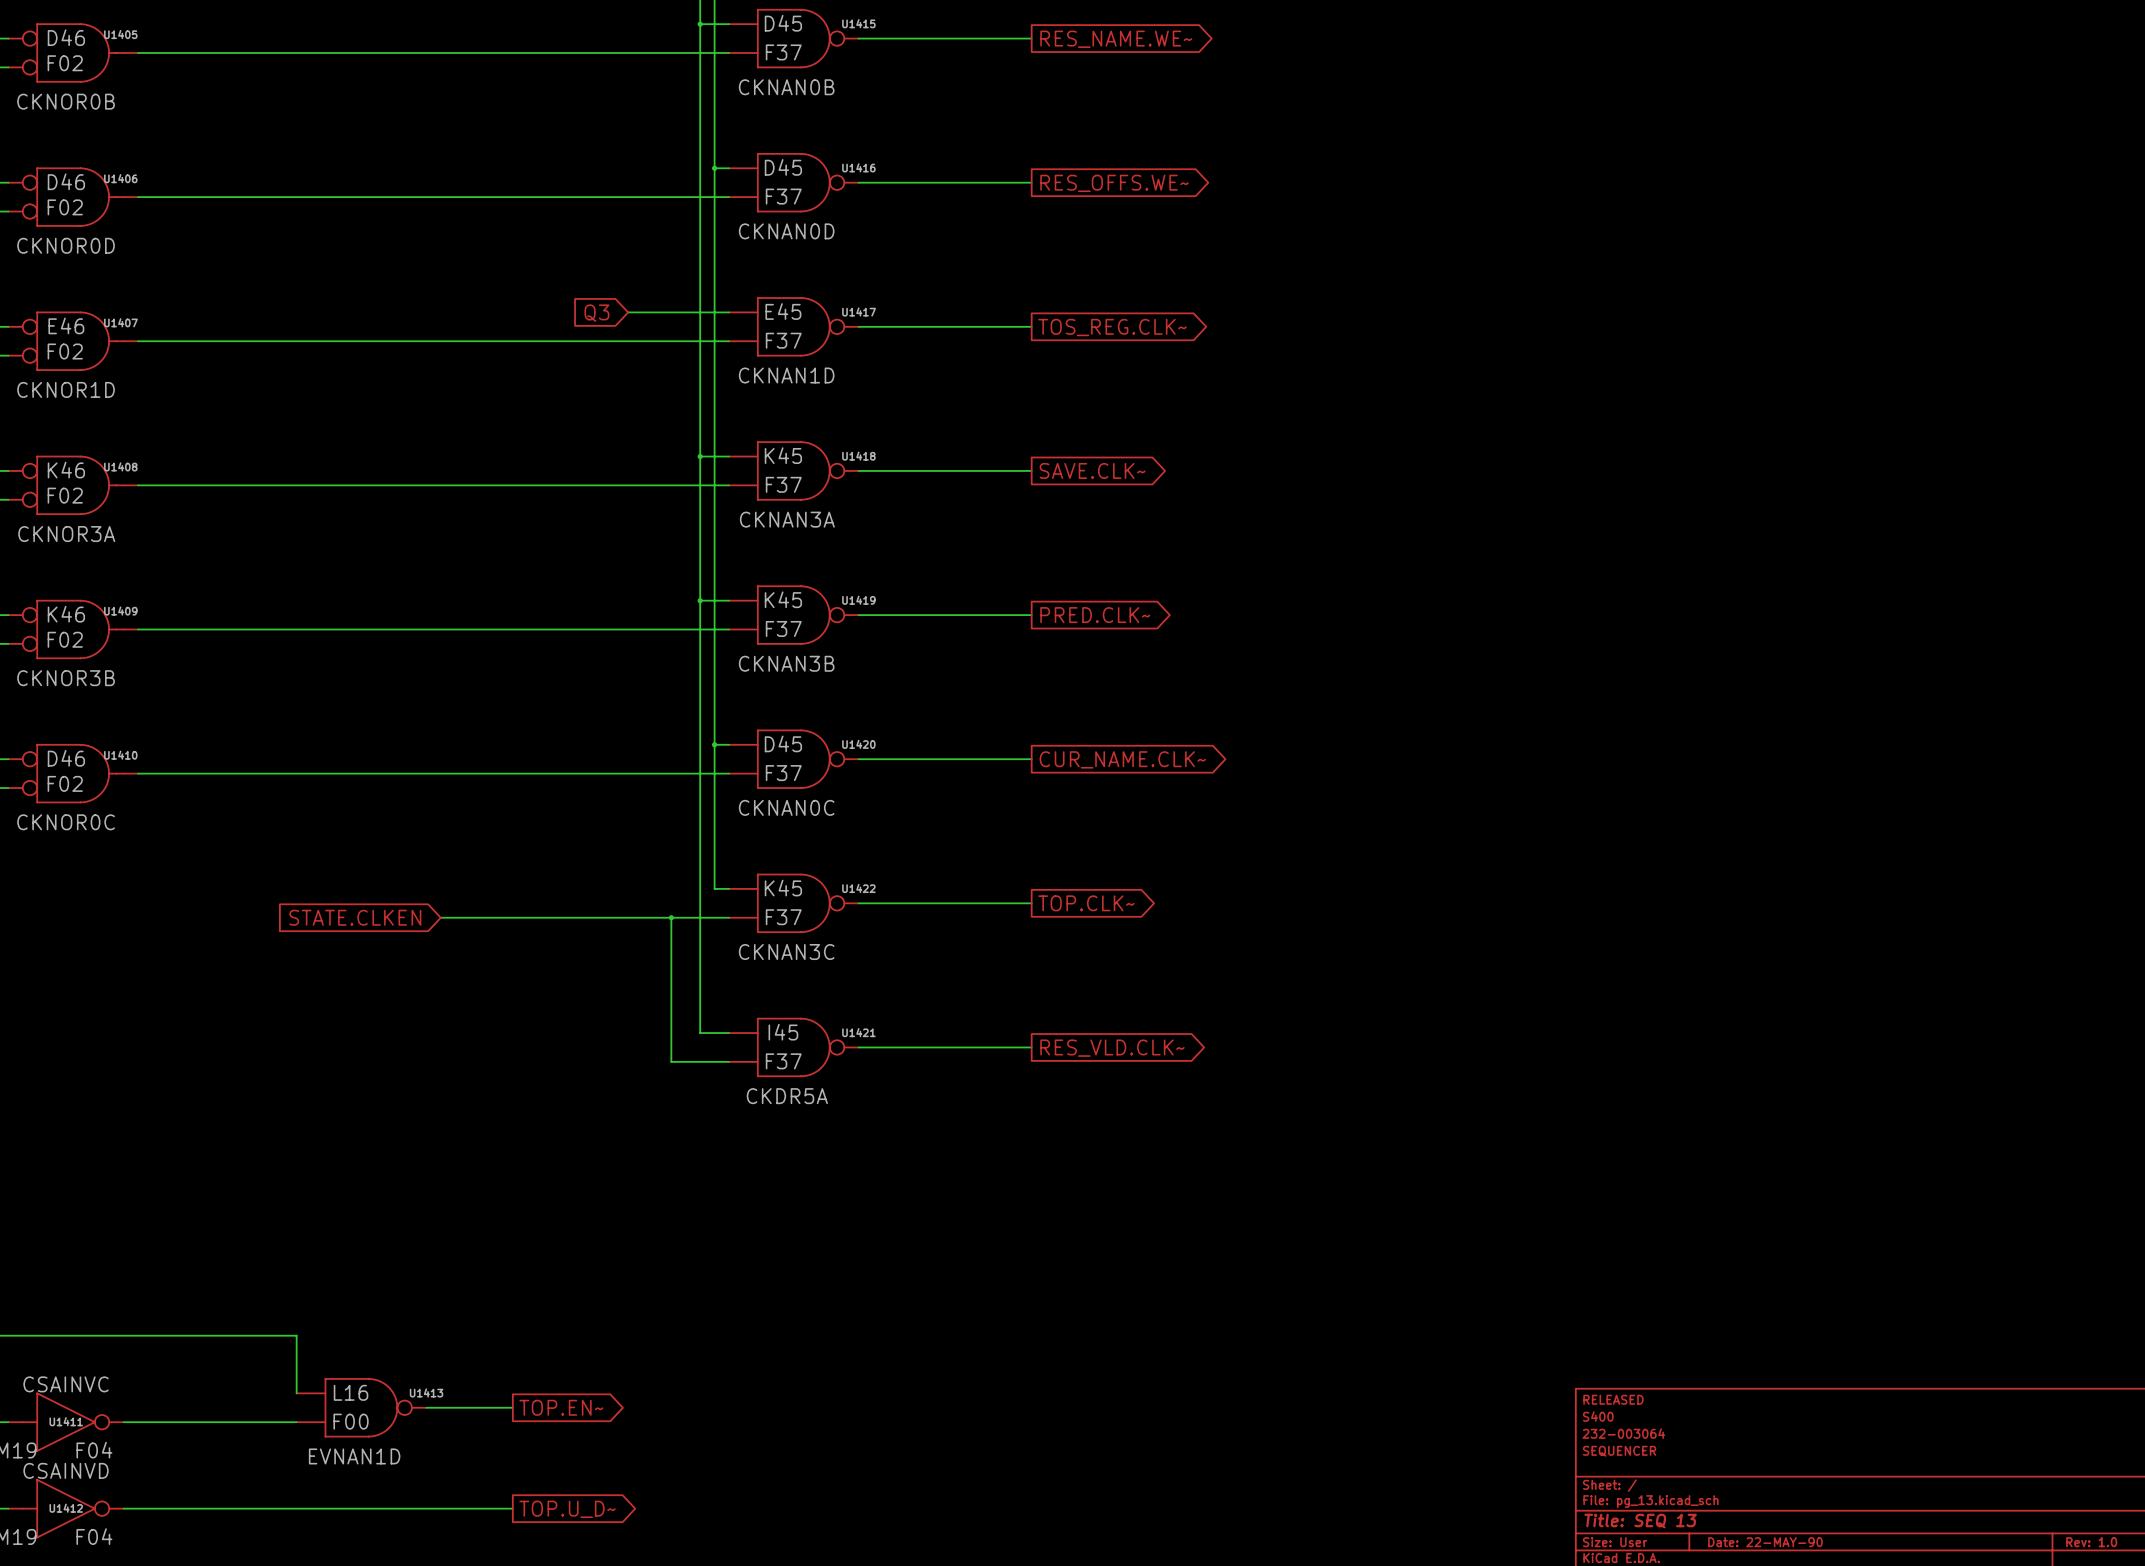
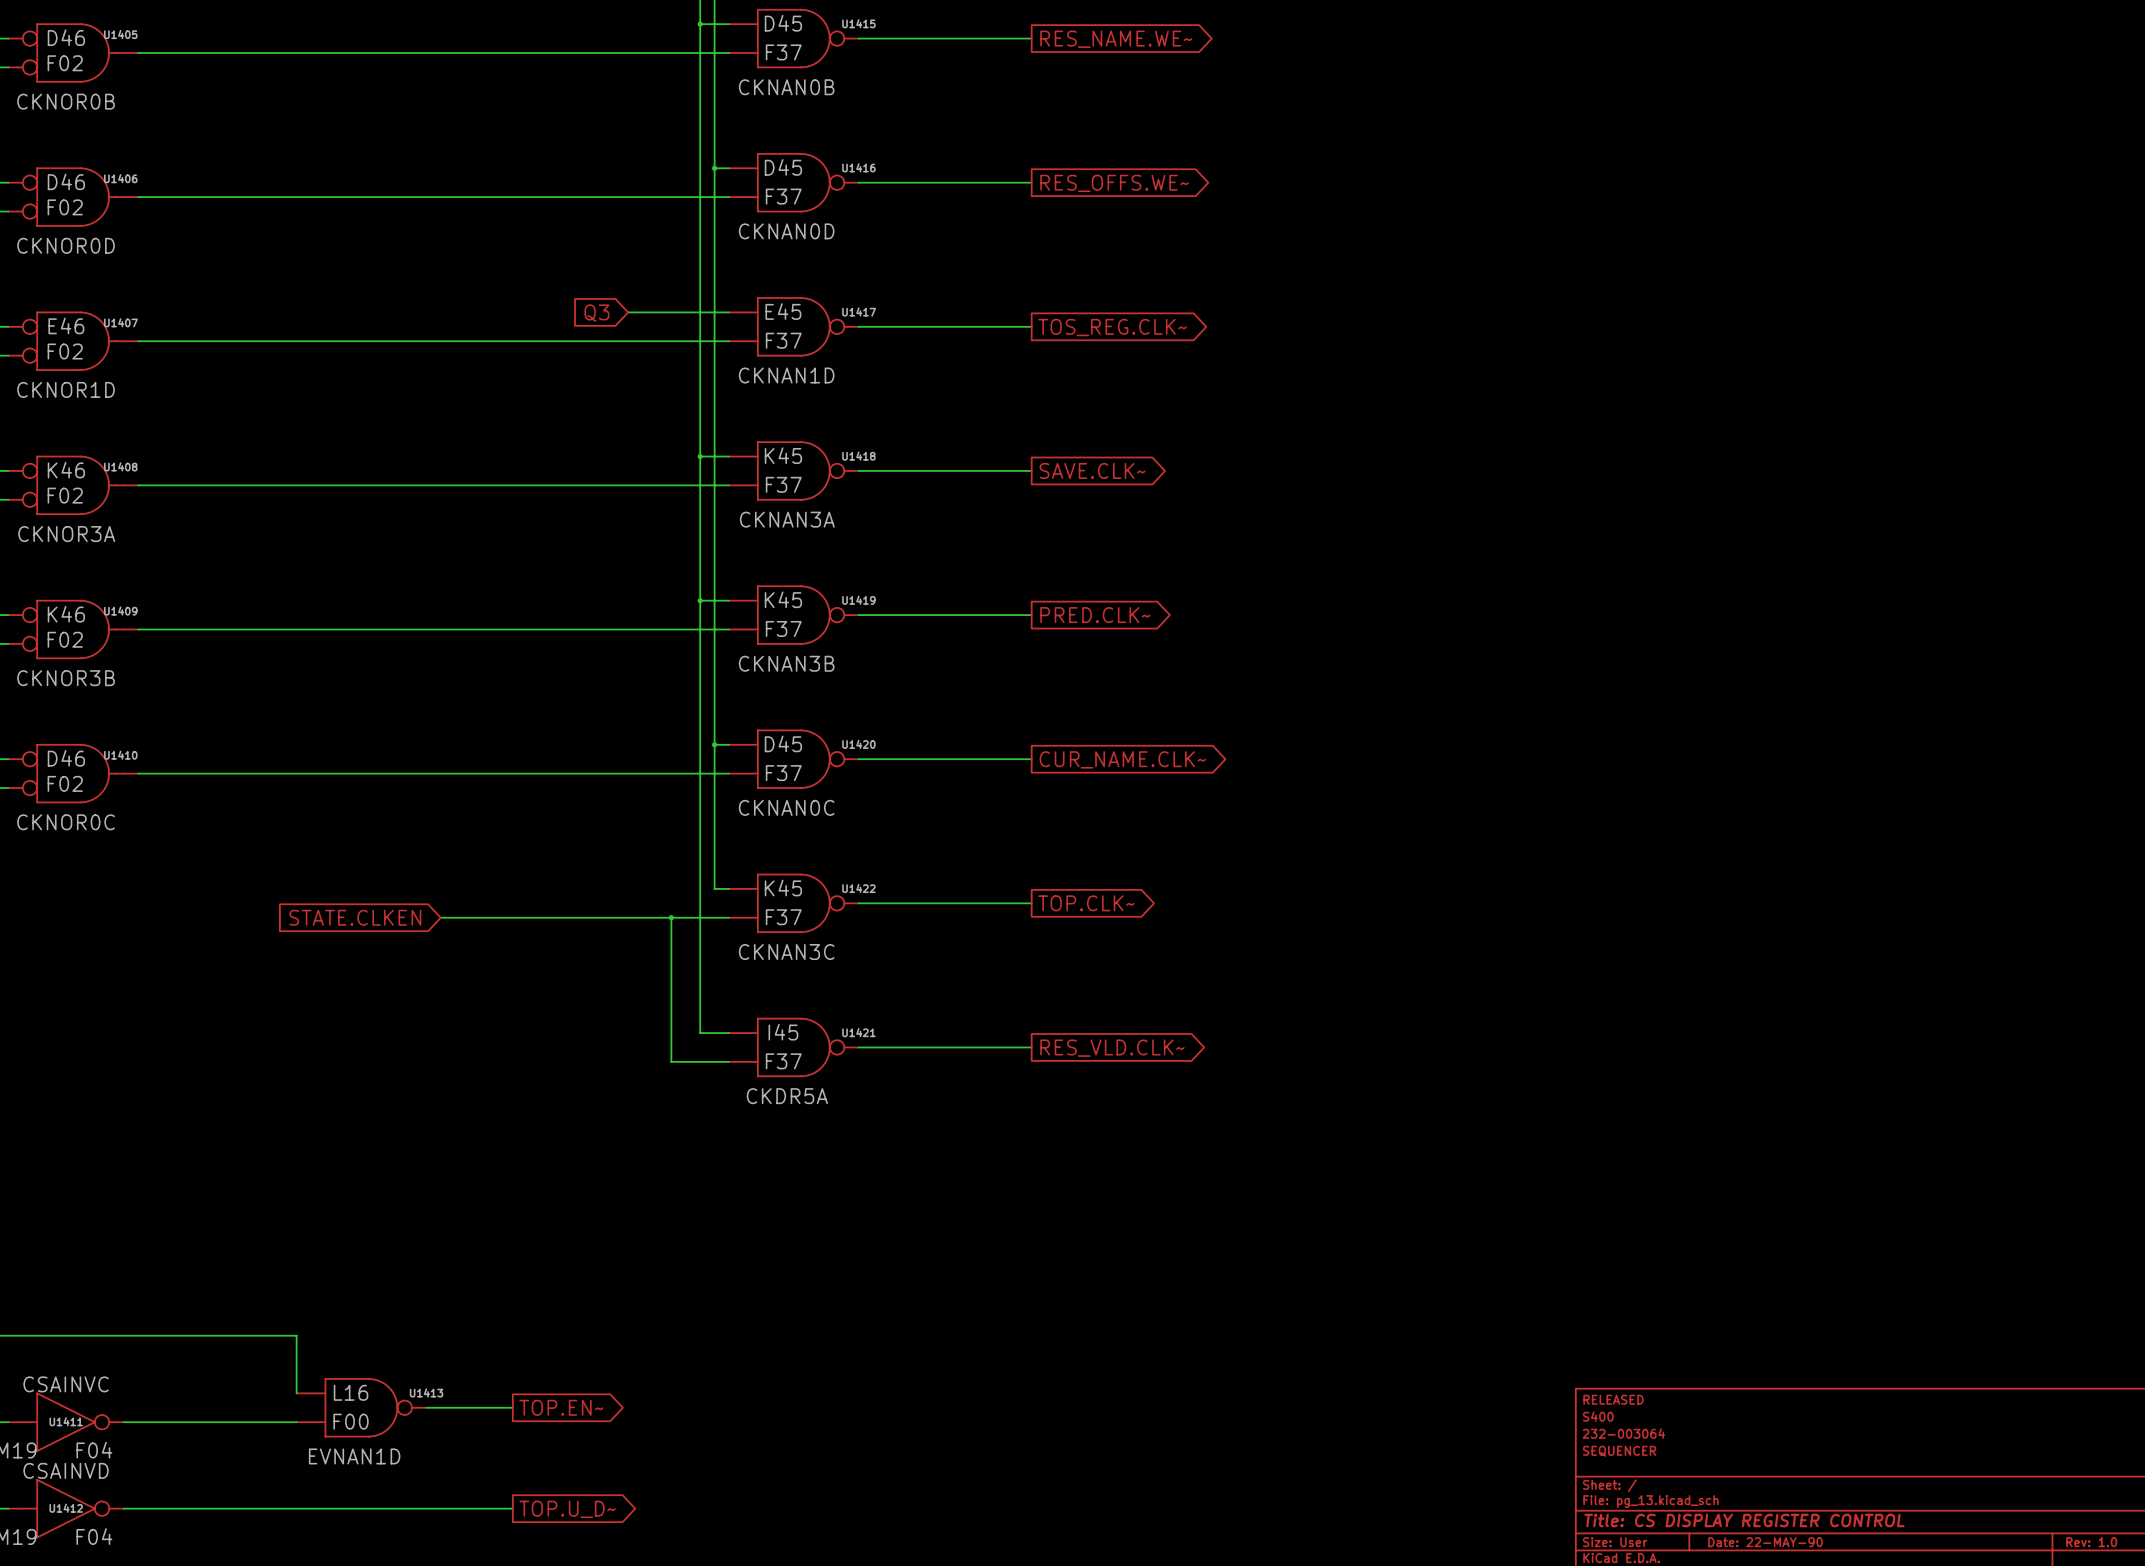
title block: Title: SEQ 13 (1640, 1521) -> Title: CS DISPLAY REGISTER CONTROL (1744, 1520)

